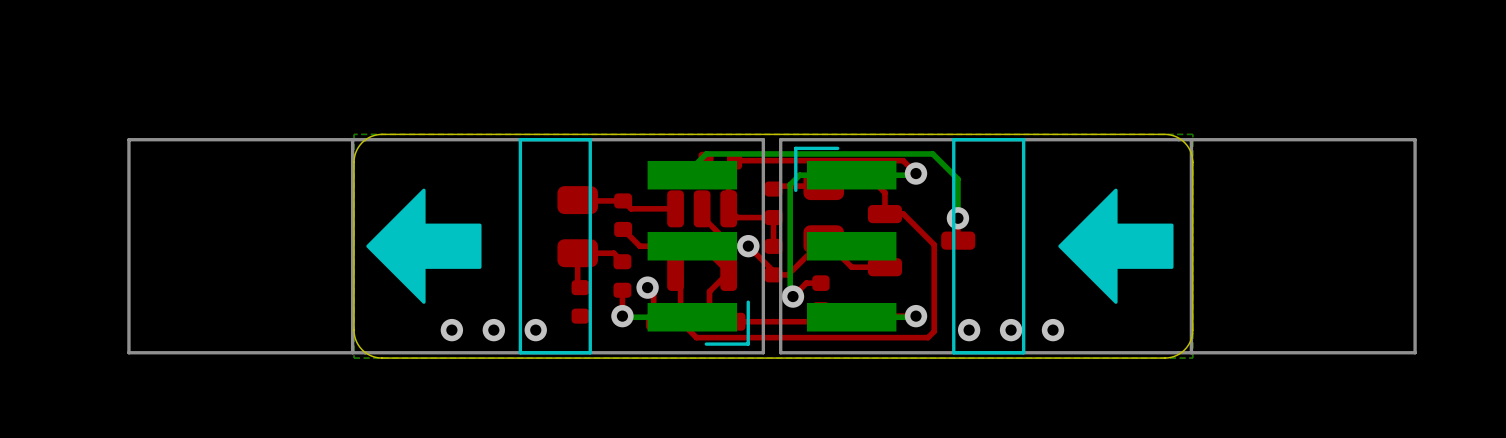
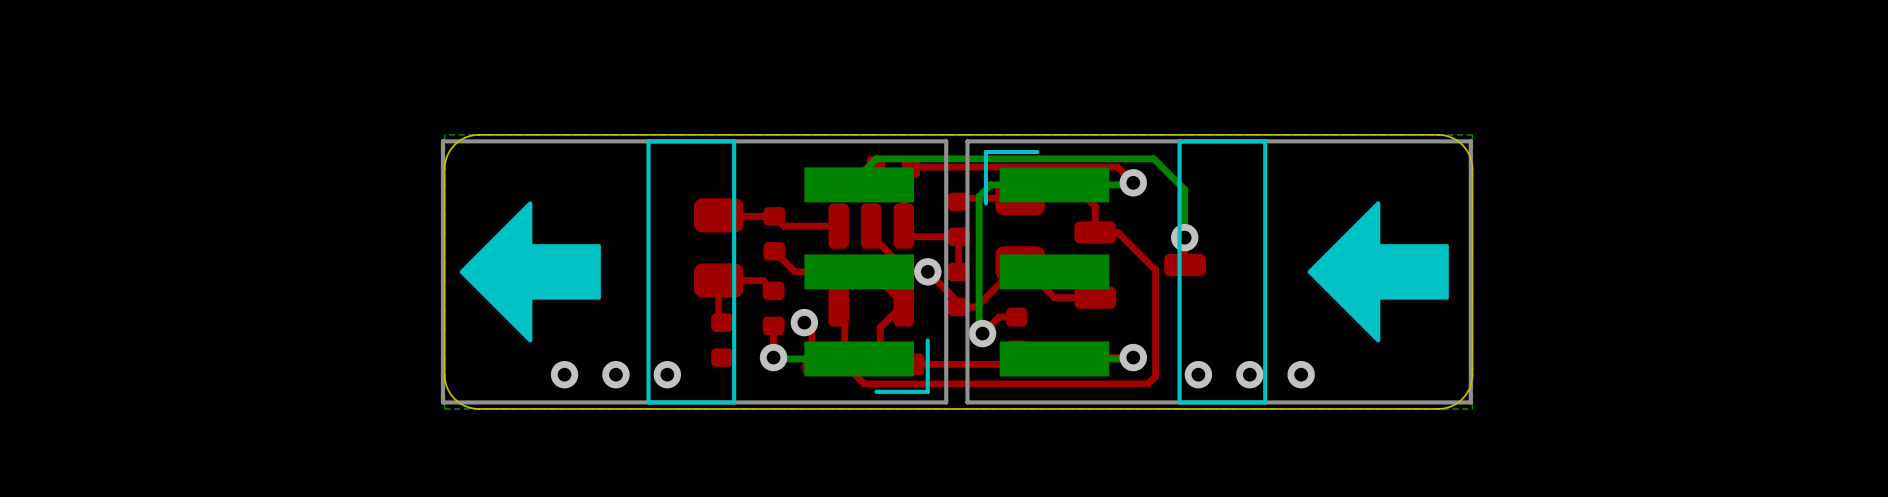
part: (446, 246) -> none
part: none -> (694, 271)
part: none -> (1219, 271)
part: (1097, 246) -> none

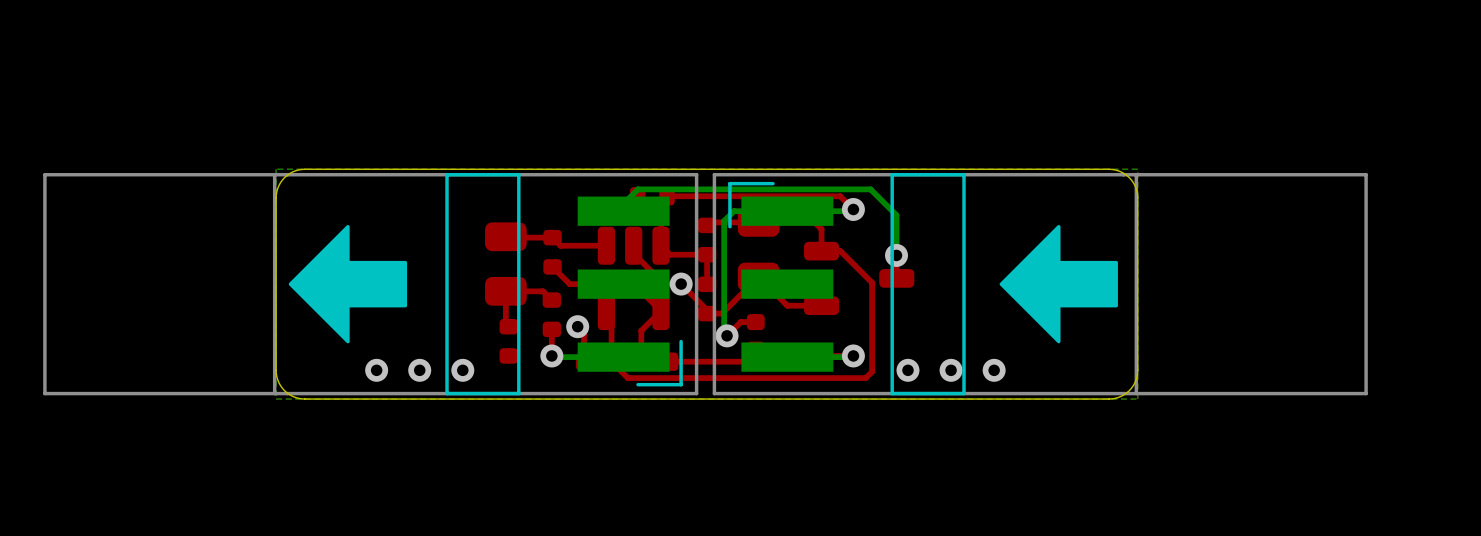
part: none -> (370, 284)
part: (694, 271) -> none
part: (1219, 271) -> none
part: none -> (1040, 284)

